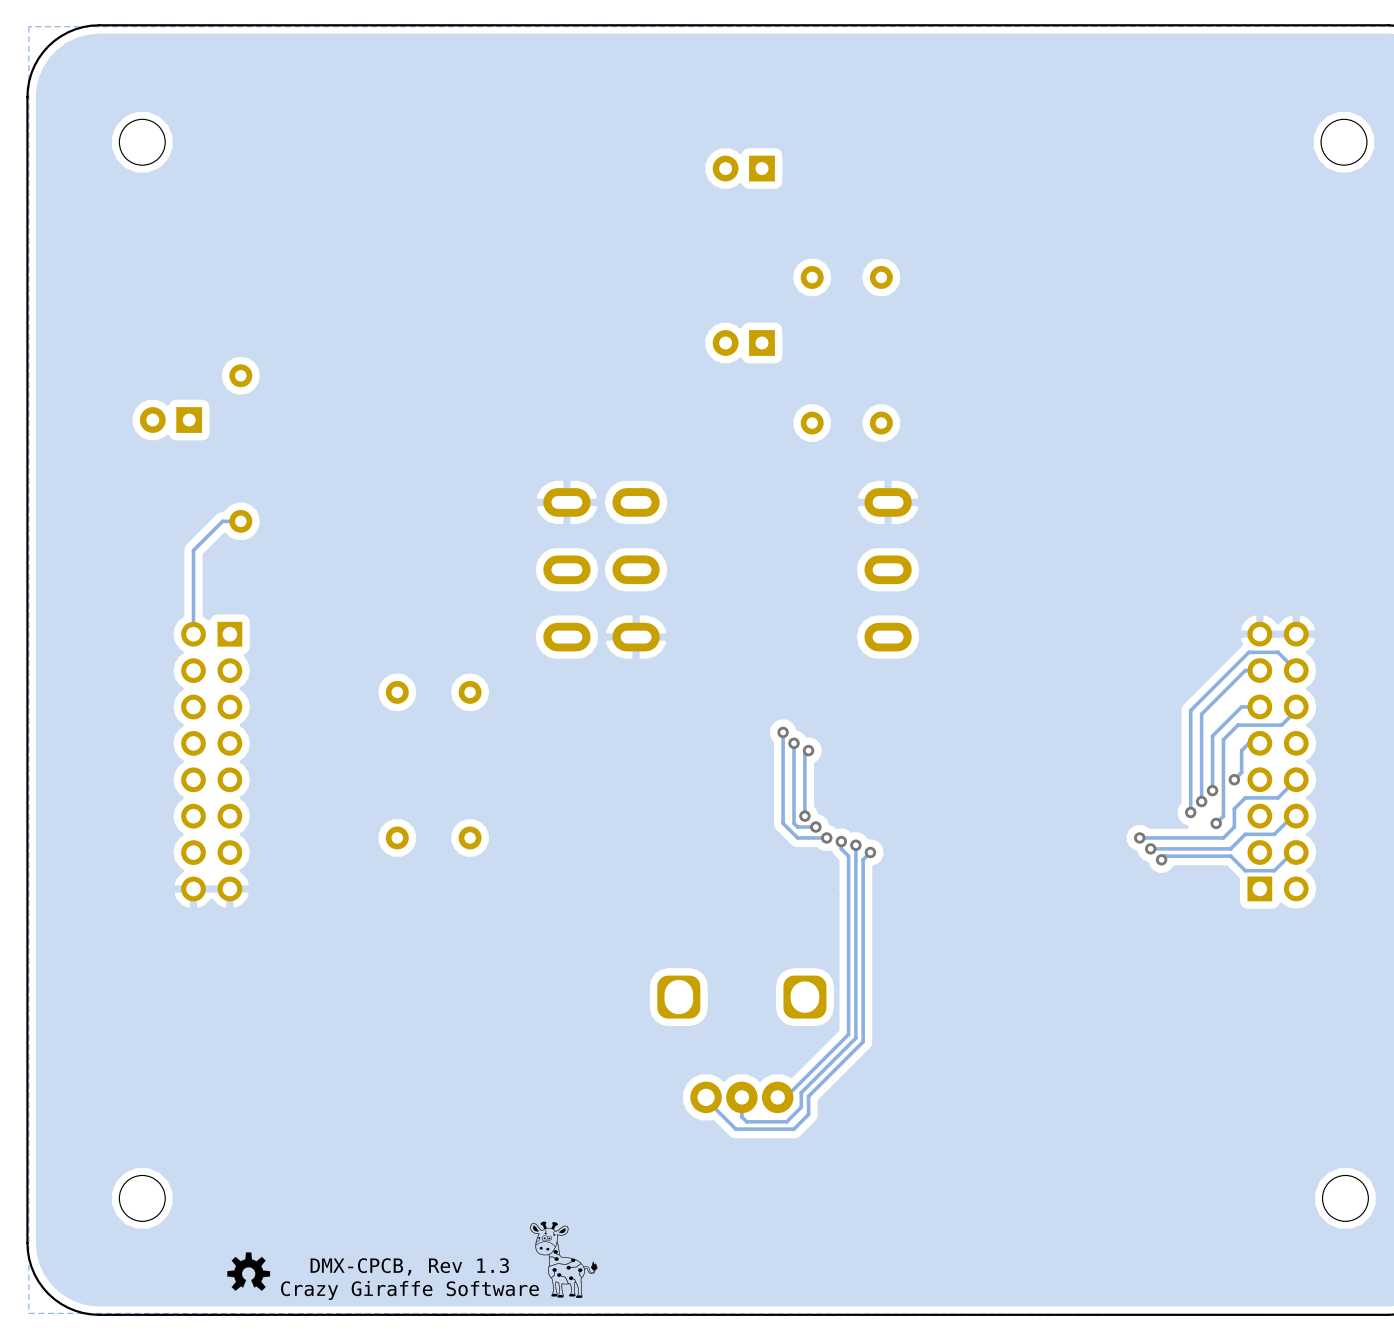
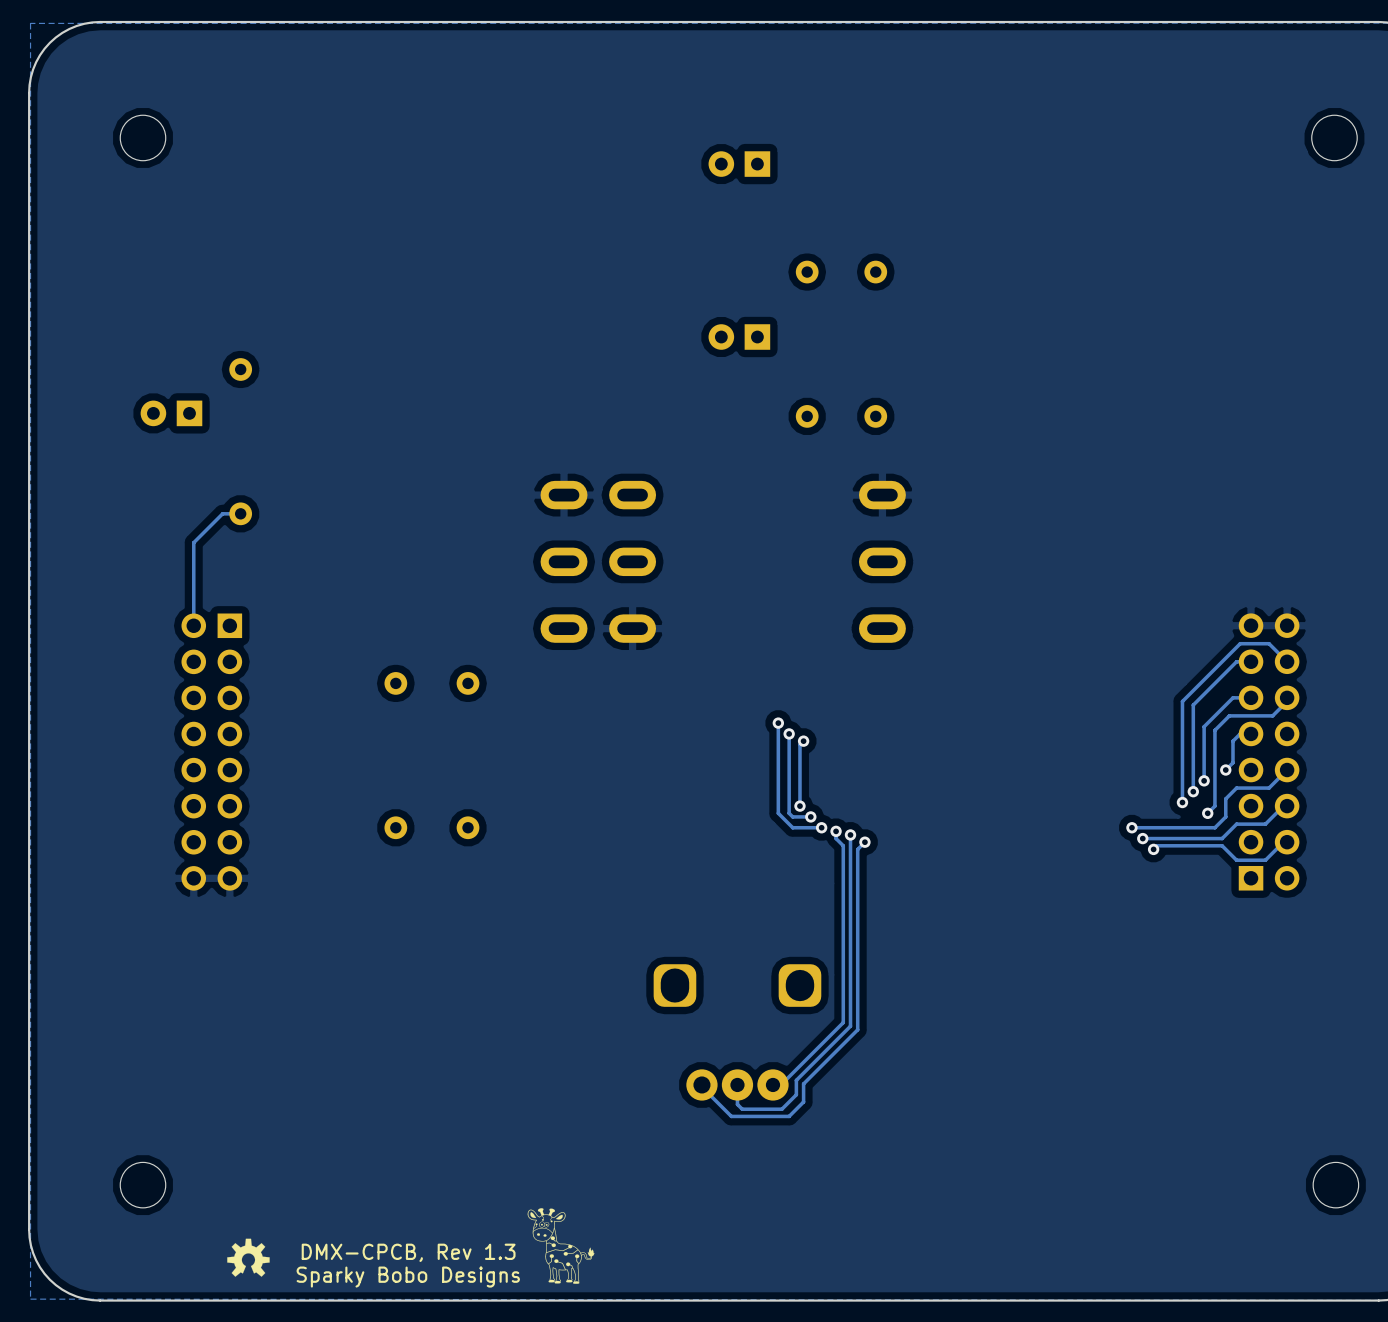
text: Crazy Giraffe Software (409, 1290) -> Sparky Bobo Designs (408, 1277)

